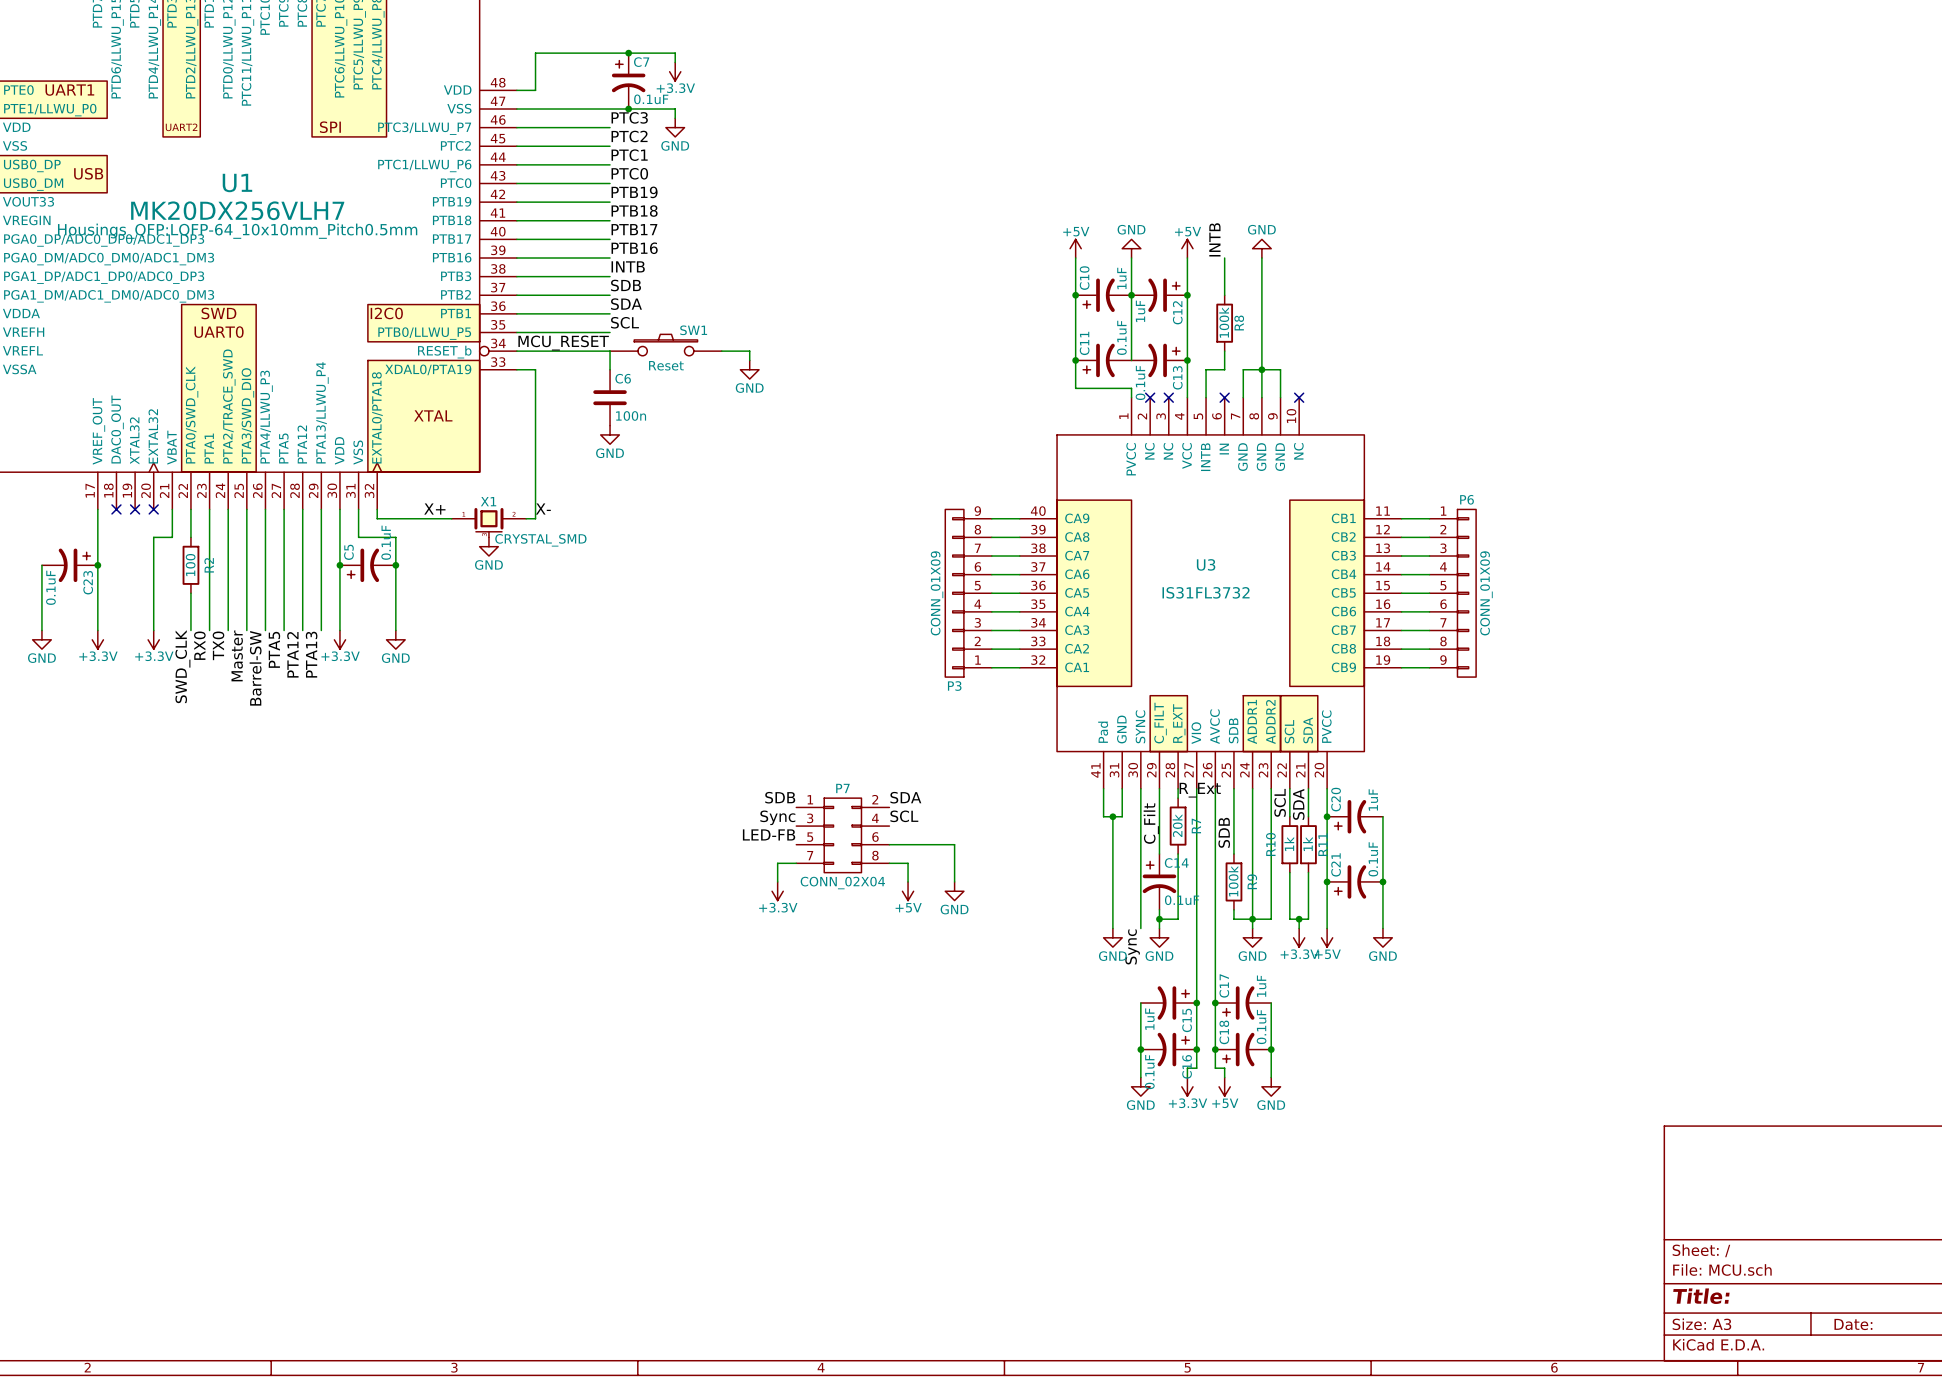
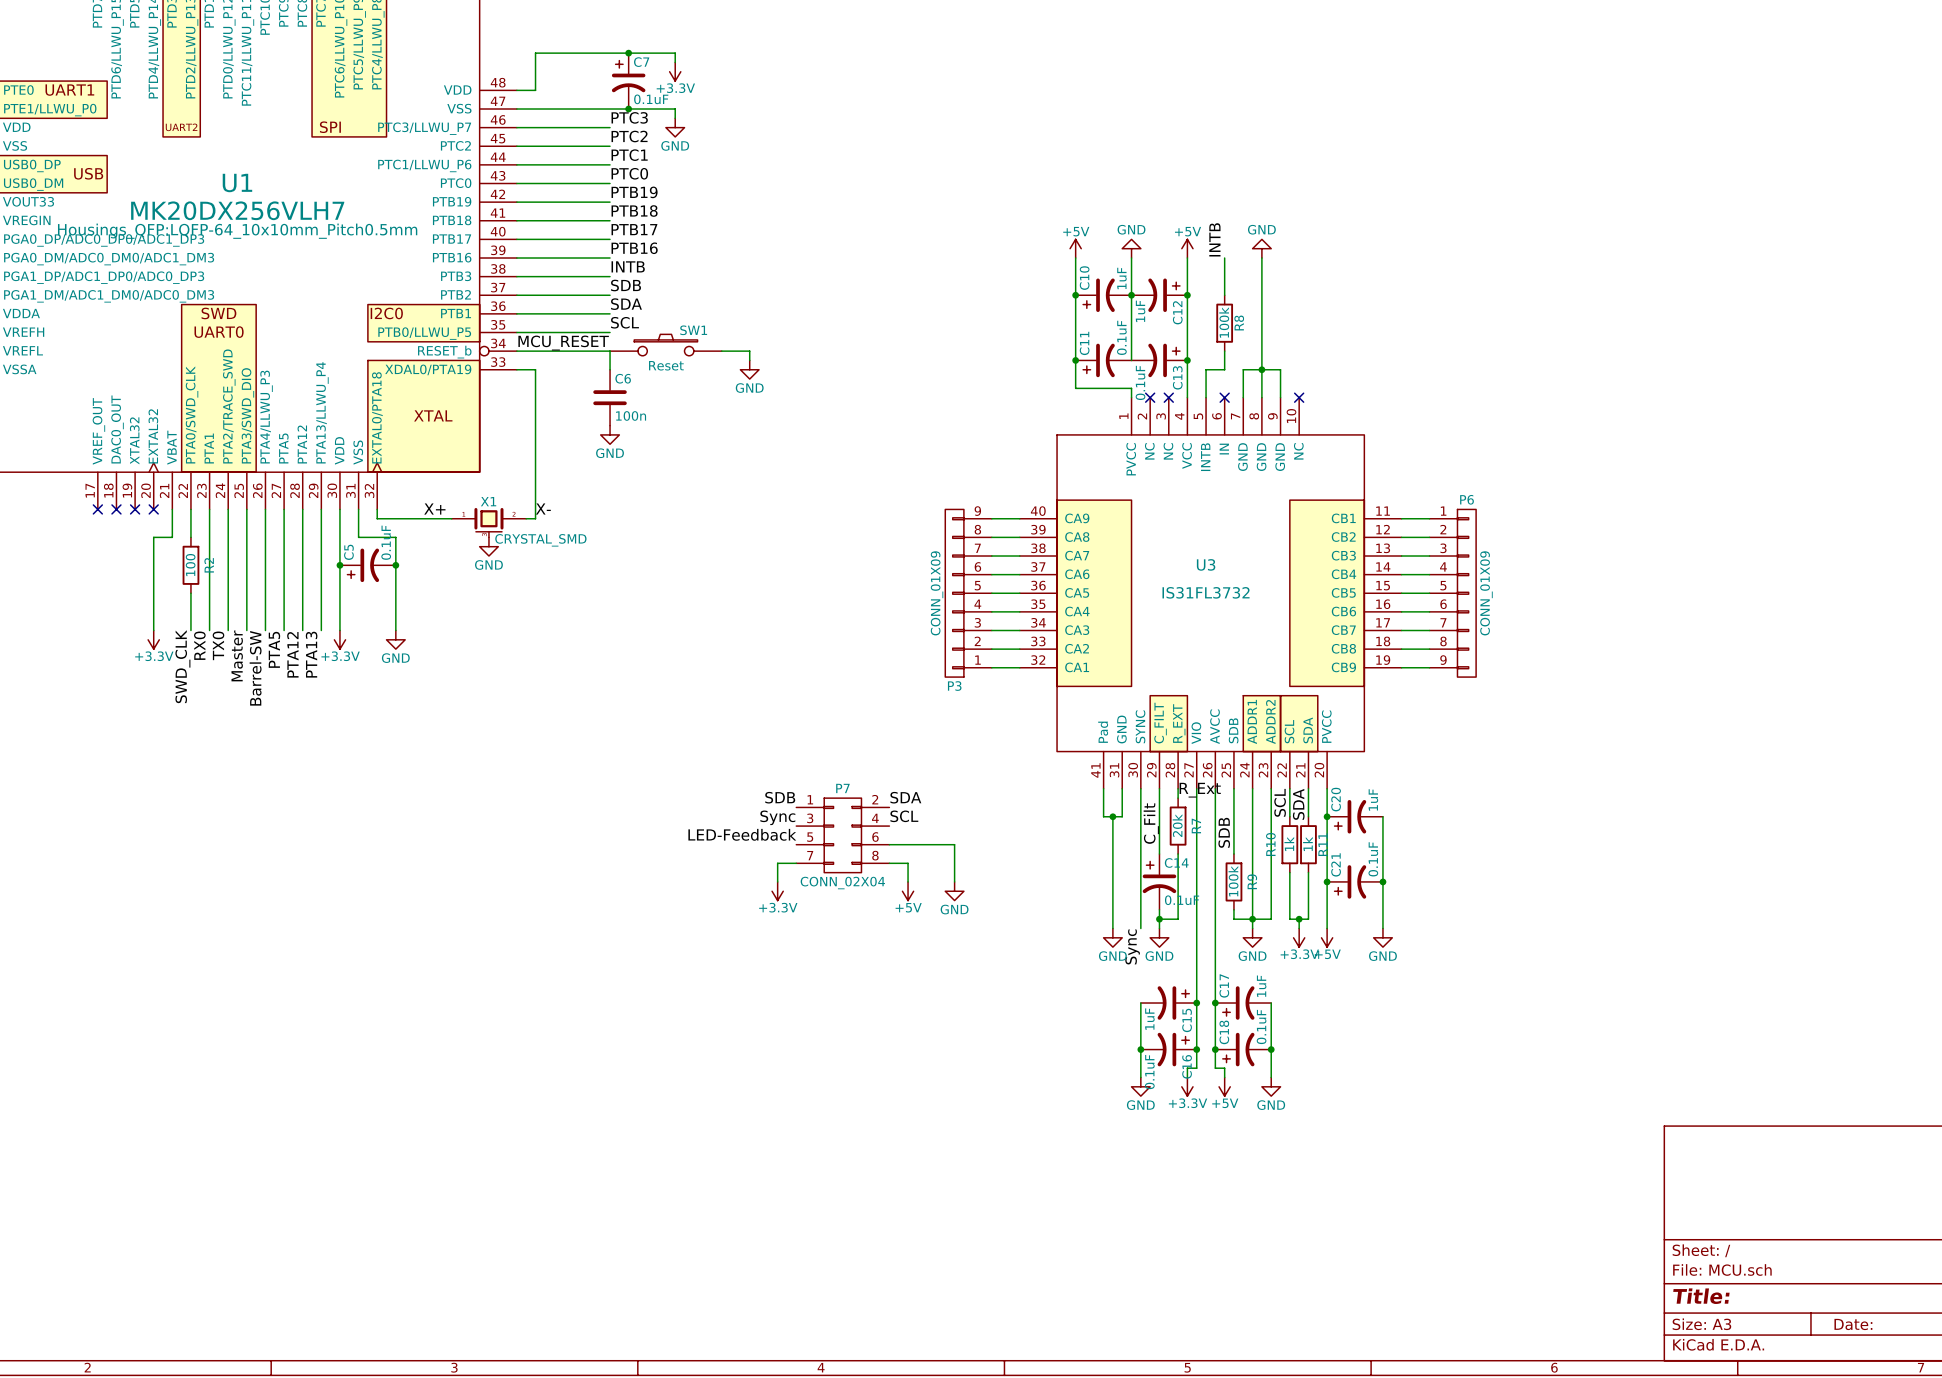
wire: (97, 509) (97, 630) -> none
no-connect mark: none -> (97, 509)
wire: (41, 565) (41, 630) -> none
C23: 0.1uF (69, 565) -> none
junction: (97, 565) -> none
power symbol: GND (41, 639) -> none
power symbol: +3.3V (97, 639) -> none
label: LED-FB (769, 834) -> LED-Feedback (742, 834)

